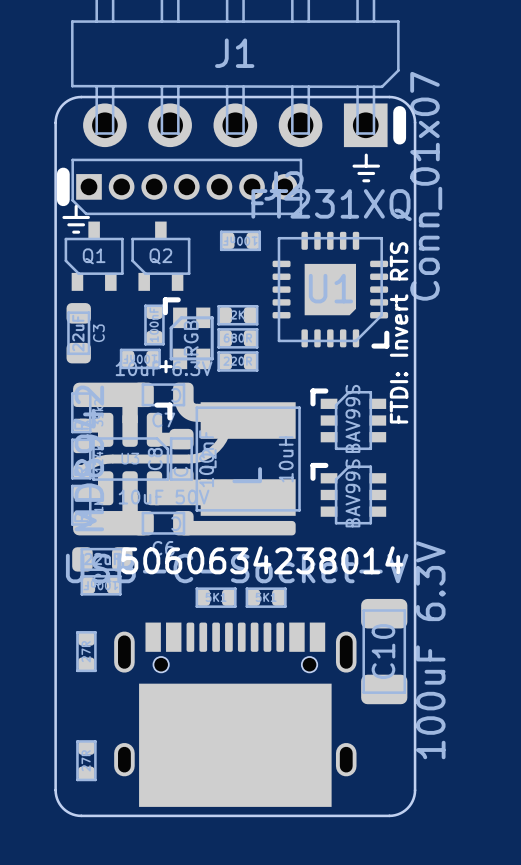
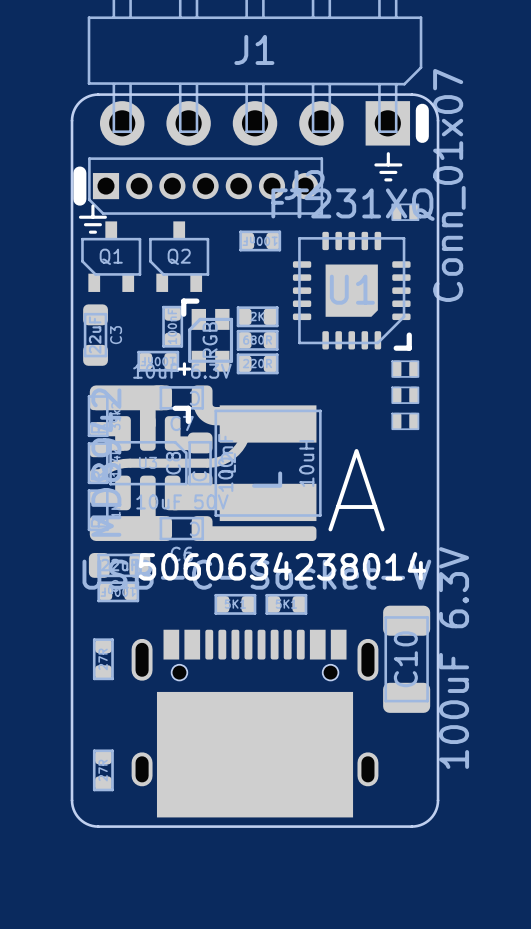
part: none -> (405, 212)
text: FTDI: Invert RTS (399, 332) -> none
part: none -> (405, 369)
part: none -> (405, 395)
part: none -> (405, 421)
part: BAV99S (348, 419) -> none
text: none -> A (356, 490)
part: BAV99S (348, 493) -> none

